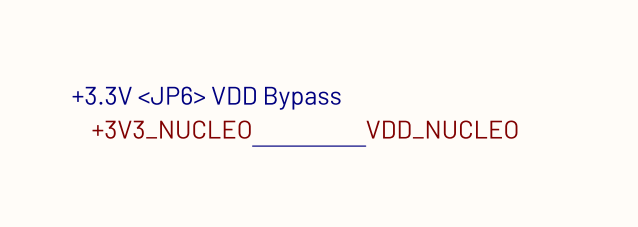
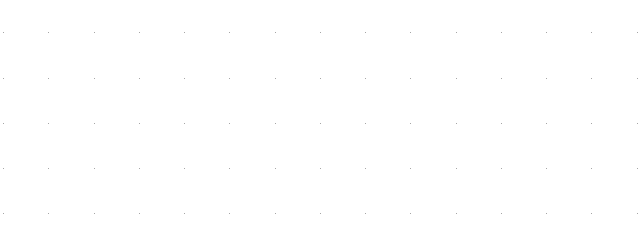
text: +3.3V <JP6> VDD Bypass (206, 98) -> none
label: +3V3_NUCLEO (171, 129) -> none
label: VDD_NUCLEO (442, 129) -> none
wire: (252, 146) (365, 146) -> none

